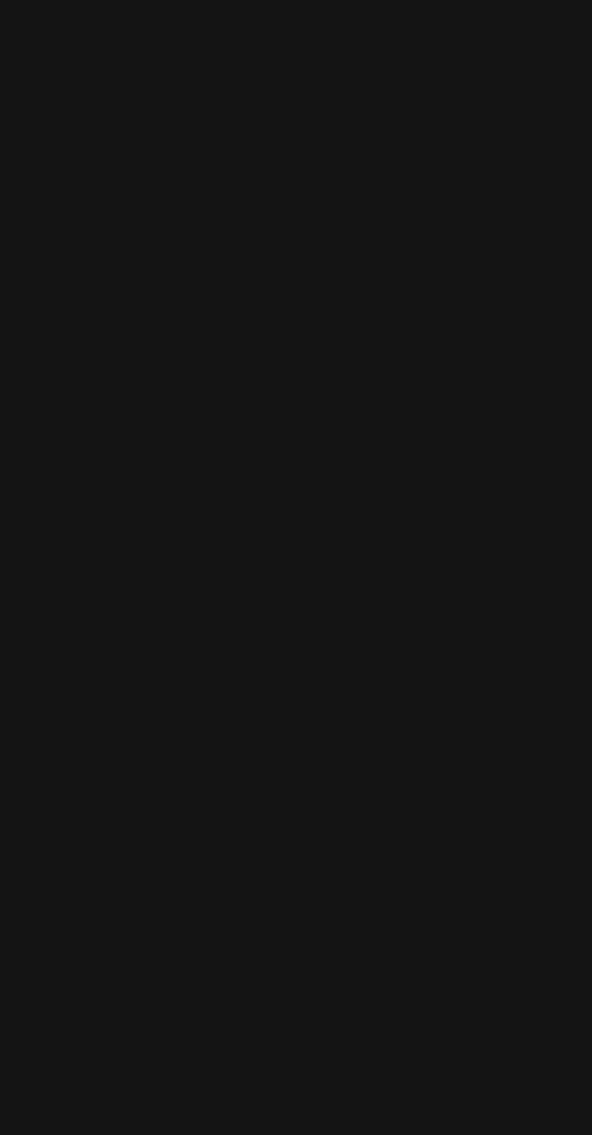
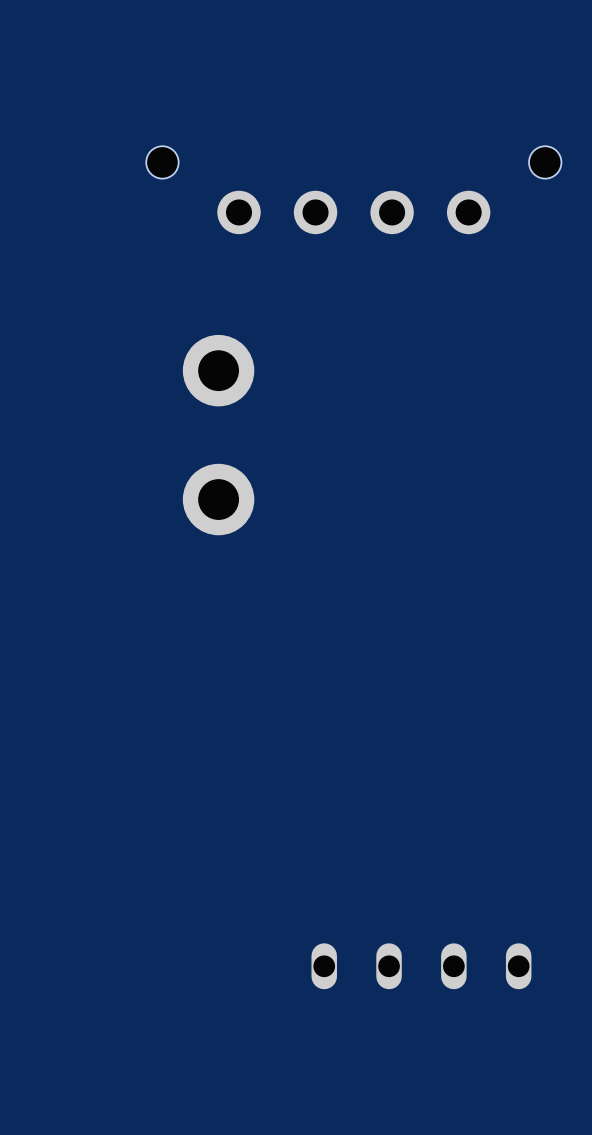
part: none -> (353, 190)
part: none -> (218, 370)
part: none -> (218, 499)
part: none -> (421, 966)

